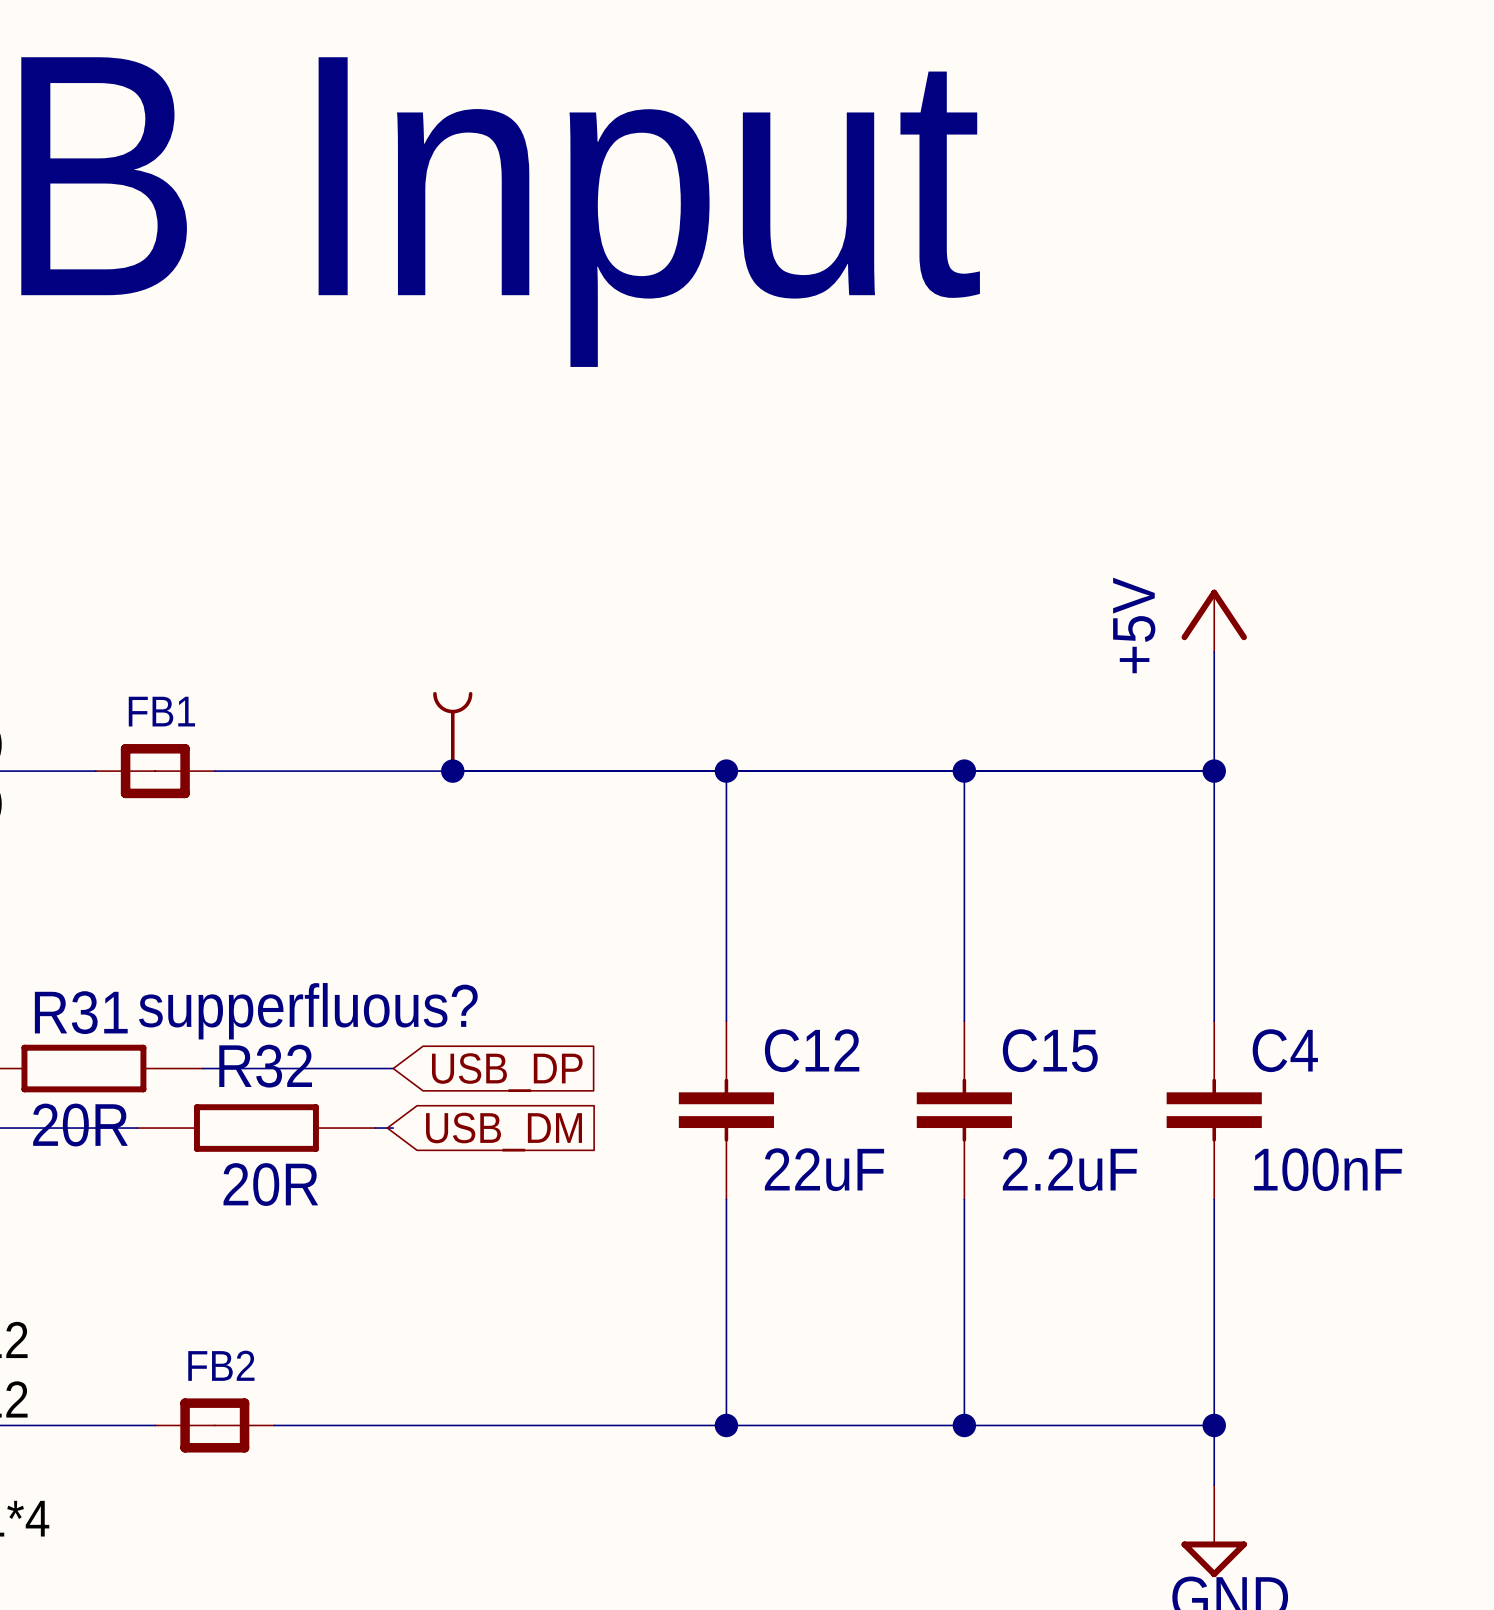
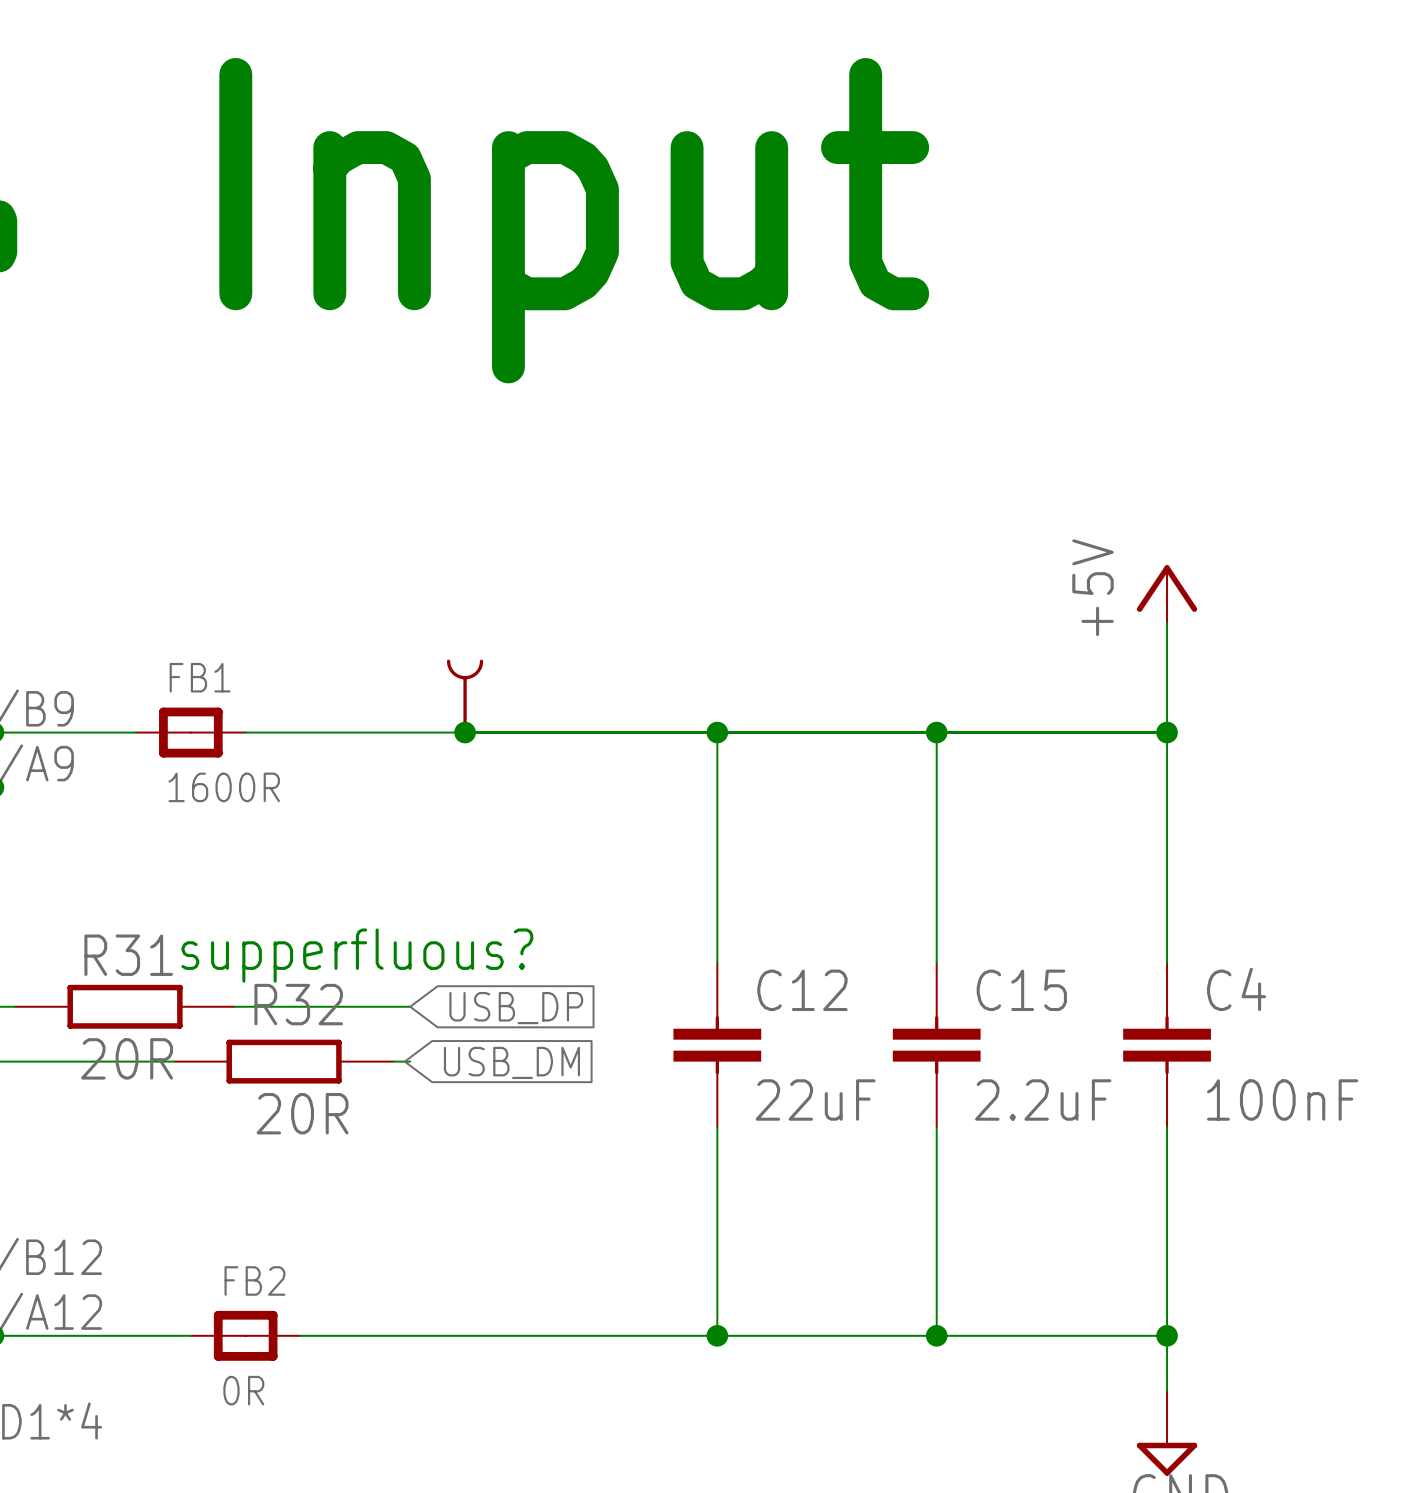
FB1 value: none -> 1600R (224, 787)
FB2 value: none -> 0R (243, 1390)

